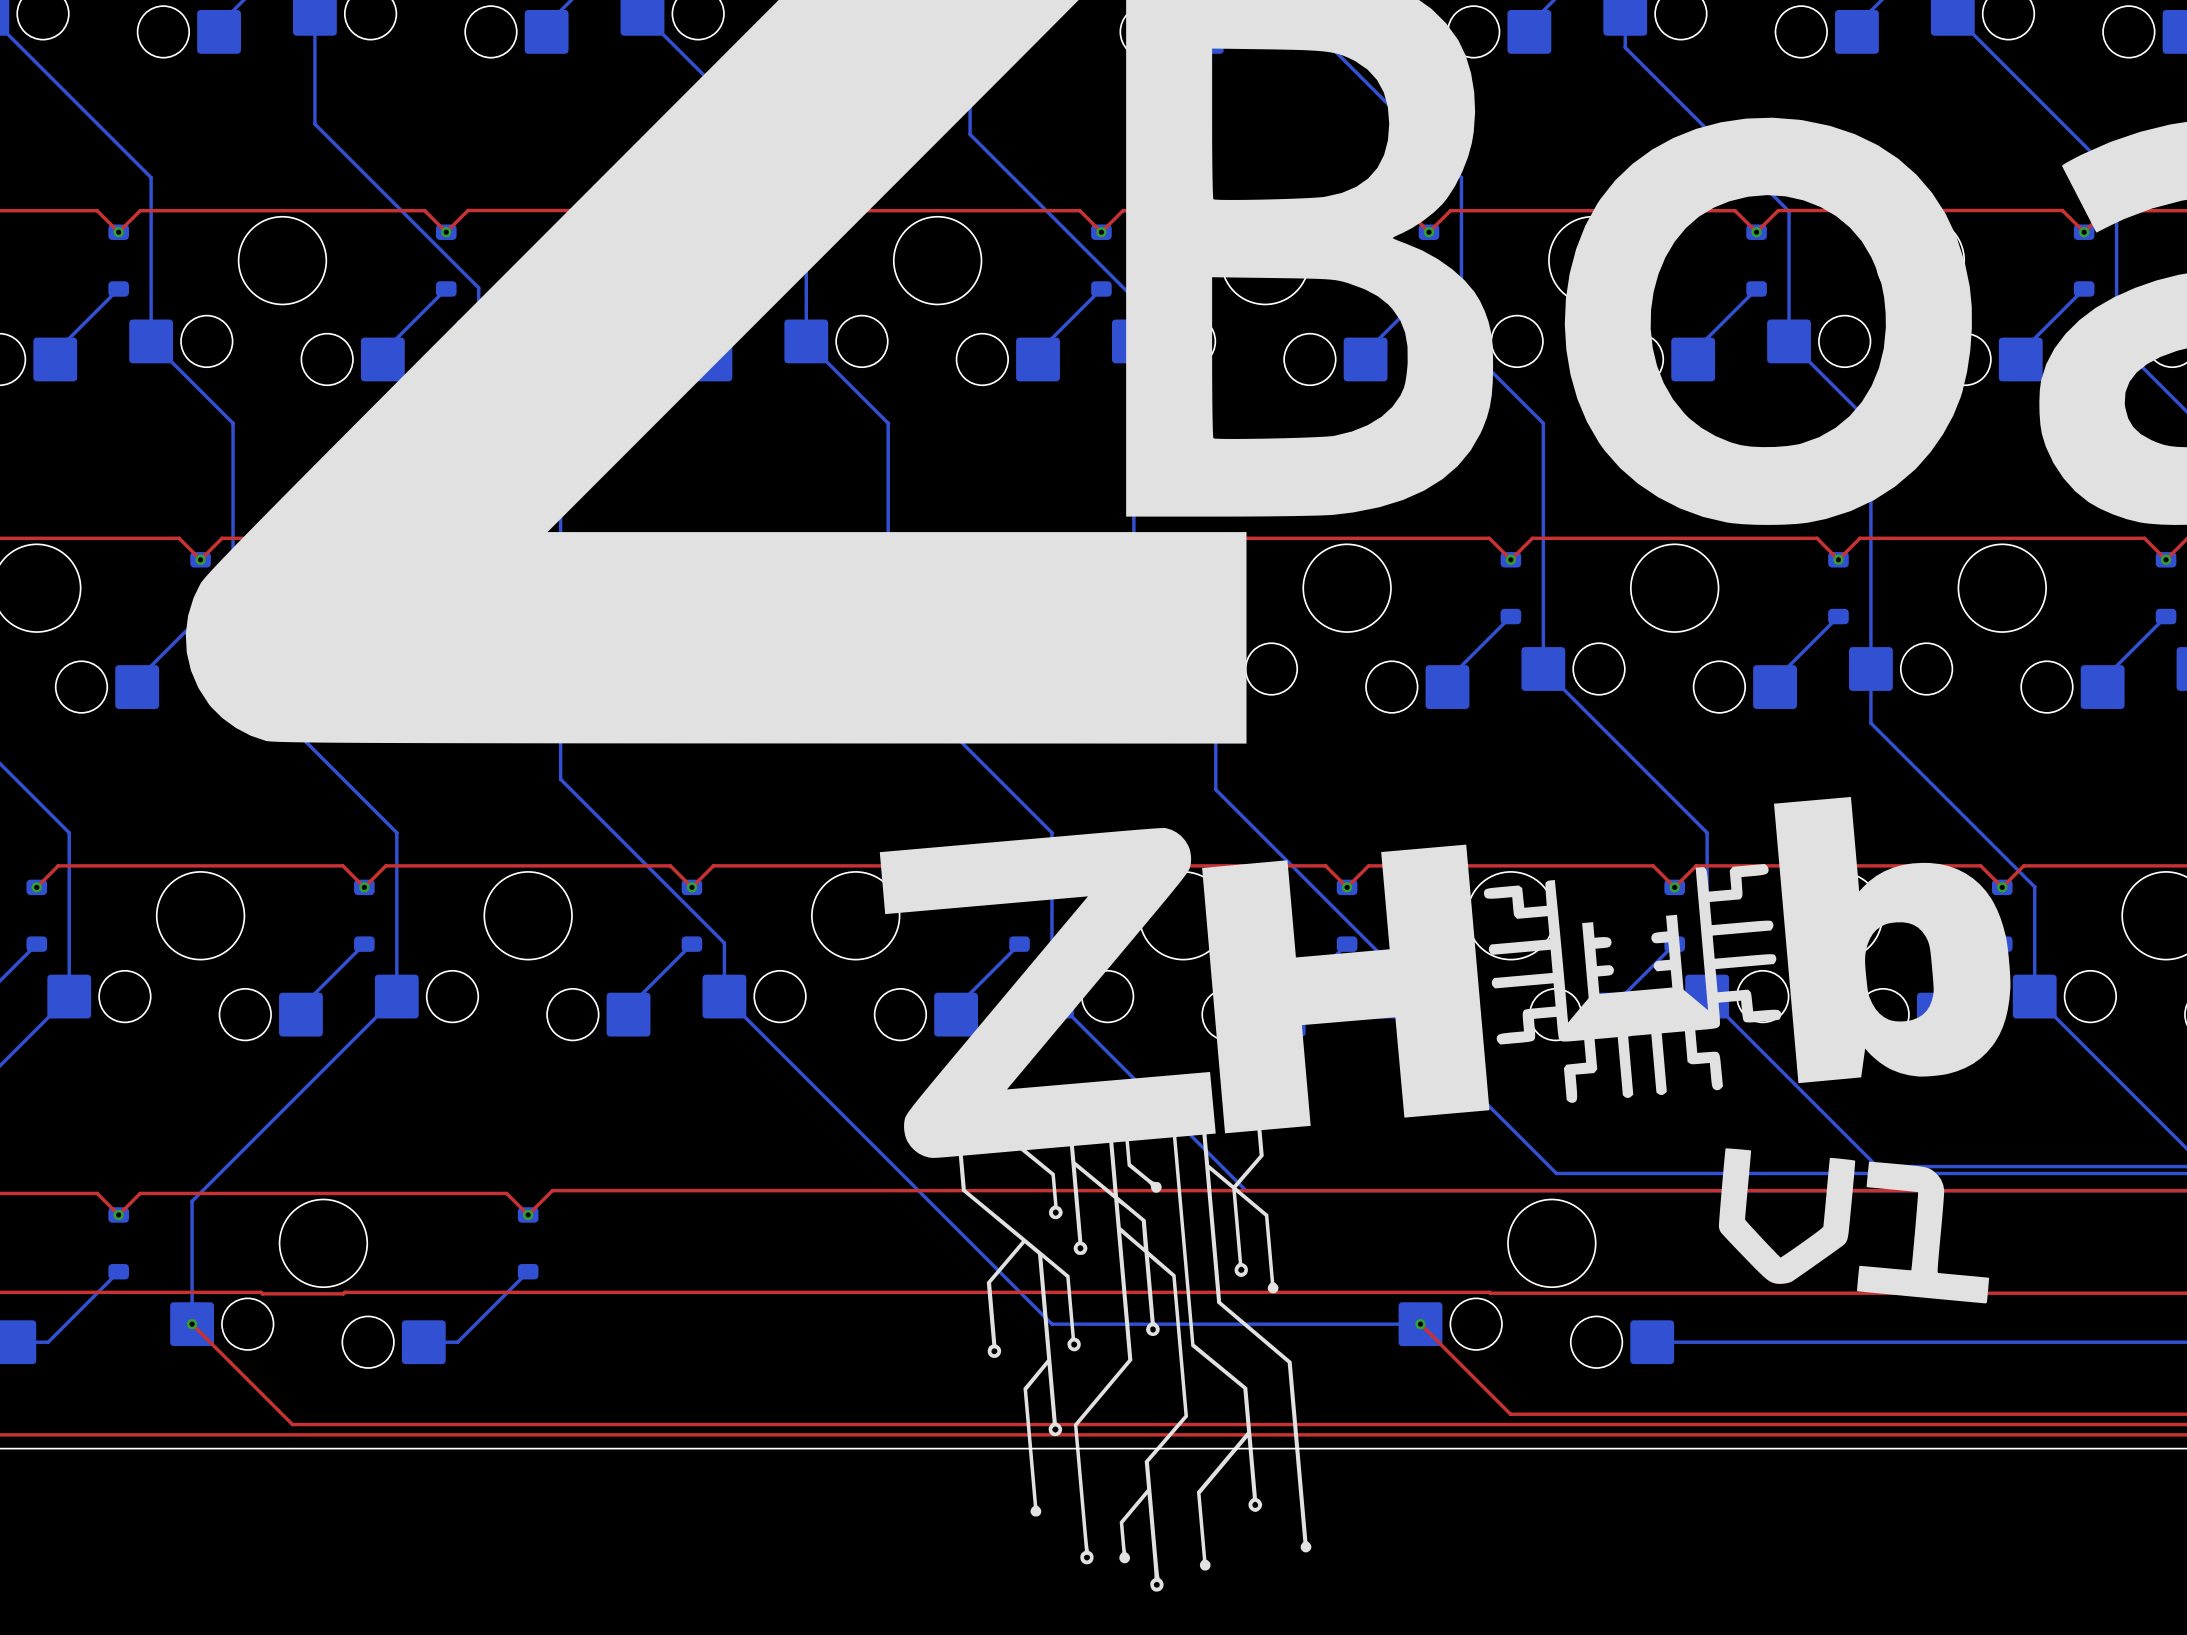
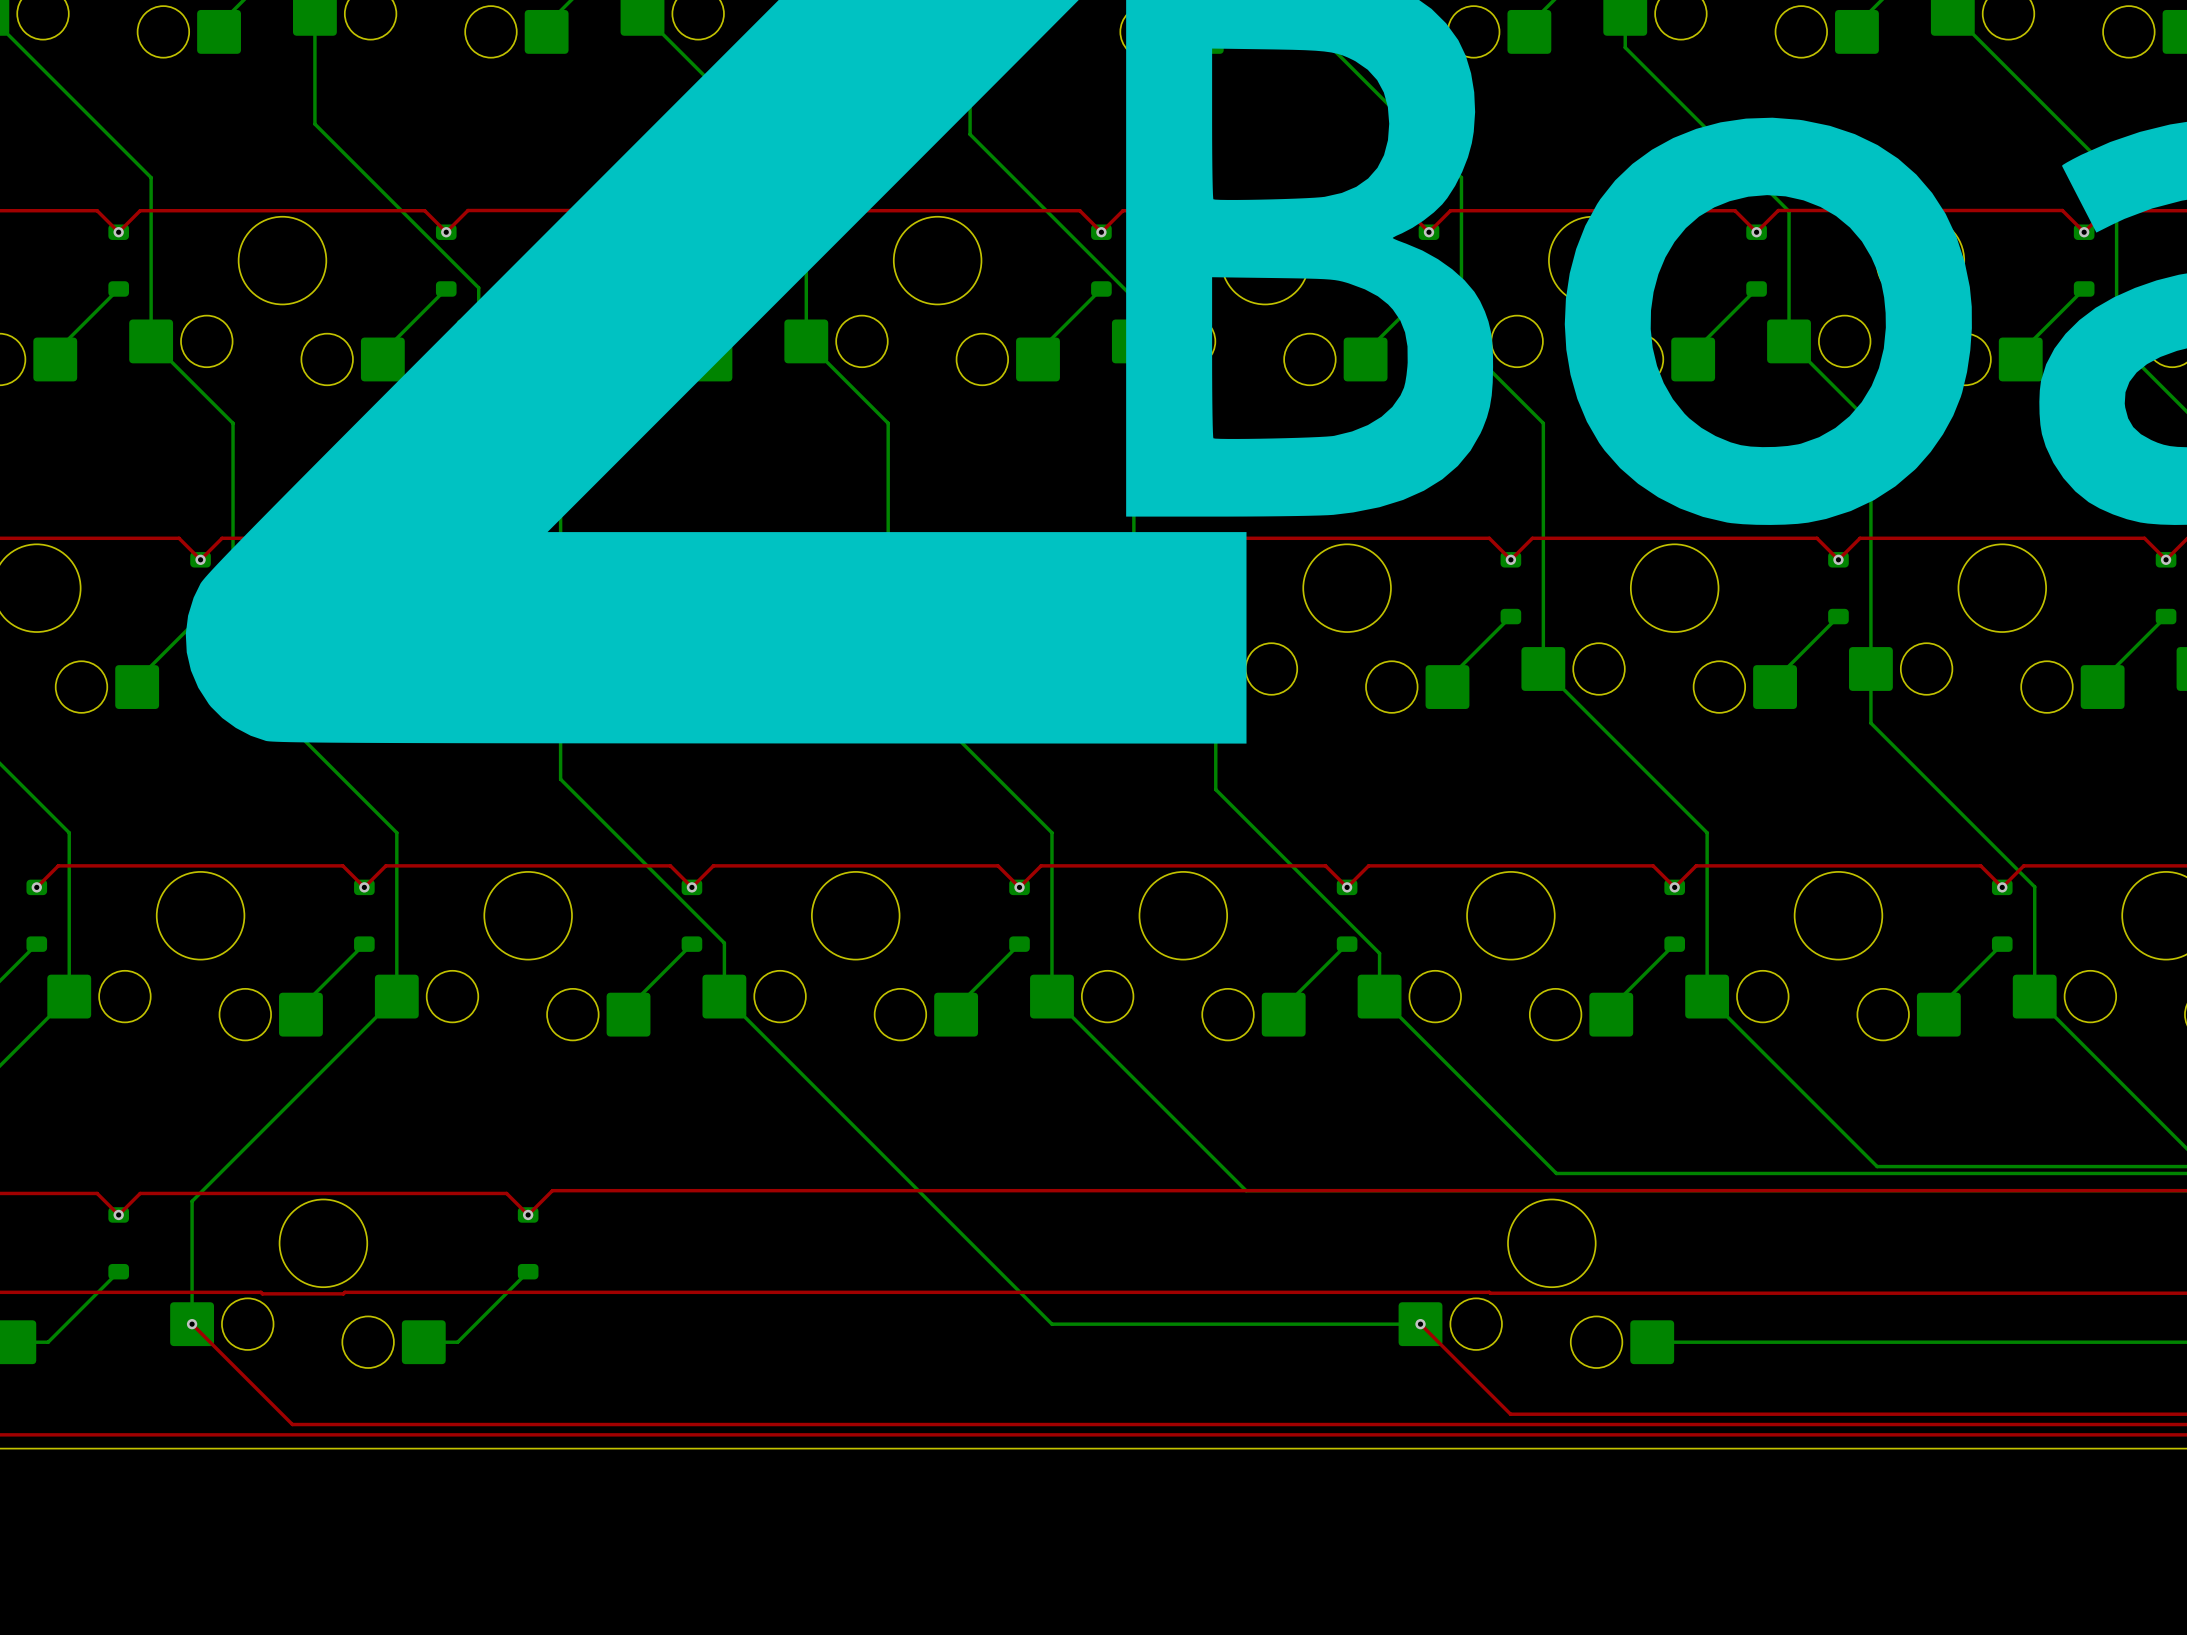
drawing: [879, 796, 2011, 1592] -> none

